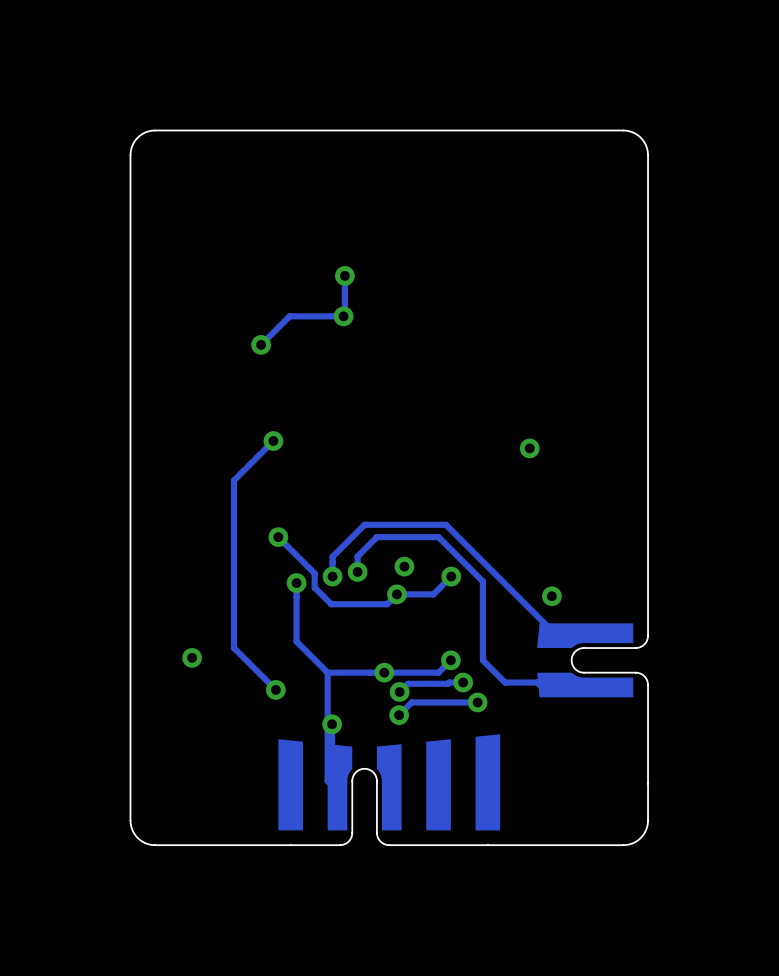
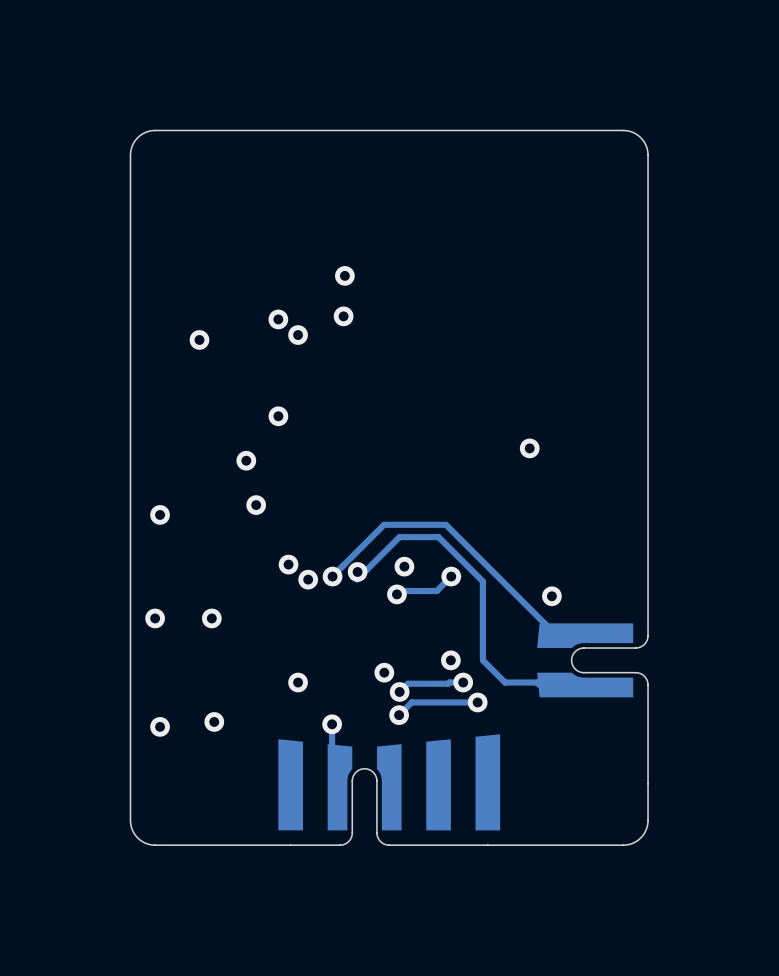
track: (344, 275) (343, 316) (289, 316) (261, 344) -> none
via: none -> (278, 319)
via: none -> (298, 335)
via: none -> (199, 339)
via: (261, 344) -> none
via: none -> (278, 416)
track: (273, 441) (233, 480) (233, 648) (275, 689) -> none
via: (273, 441) -> none
via: none -> (246, 460)
via: none -> (256, 505)
via: none -> (160, 514)
track: (384, 524) (364, 524) (332, 556) (332, 576) -> (384, 524) (332, 576)
track: (278, 537) (314, 573) (314, 587) (331, 604) (387, 604) (396, 594) (433, 594) (436, 591) -> (398, 591) (436, 591)
via: (278, 537) -> none
track: (399, 537) (376, 537) (357, 556) (357, 571) -> (399, 537) (357, 579)
via: none -> (288, 564)
via: none -> (308, 579)
track: (296, 583) (296, 641) (327, 672) -> none
via: (296, 583) -> none
via: none -> (155, 618)
via: none -> (211, 618)
via: (192, 657) -> none
track: (450, 660) (438, 672) (327, 672) -> none
track: (327, 672) (327, 781) (332, 785) -> none
via position: (275, 689) -> (298, 682)
via: none -> (214, 721)
via: none -> (160, 726)

